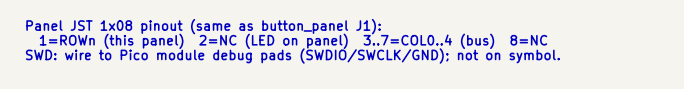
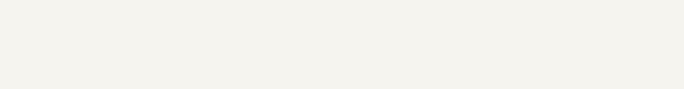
text: Panel JST 1x08 pinout (same as button_panel J1): (203, 26) -> none
text: 1=ROWn (this panel) 2=NC (LED on panel) 3..7=COL0..4 (bus) 8=NC (293, 41) -> none
text: SWD: wire to Pico module debug pads (SWDIO/SWCLK/GND); not on symbol. (292, 56) -> none

